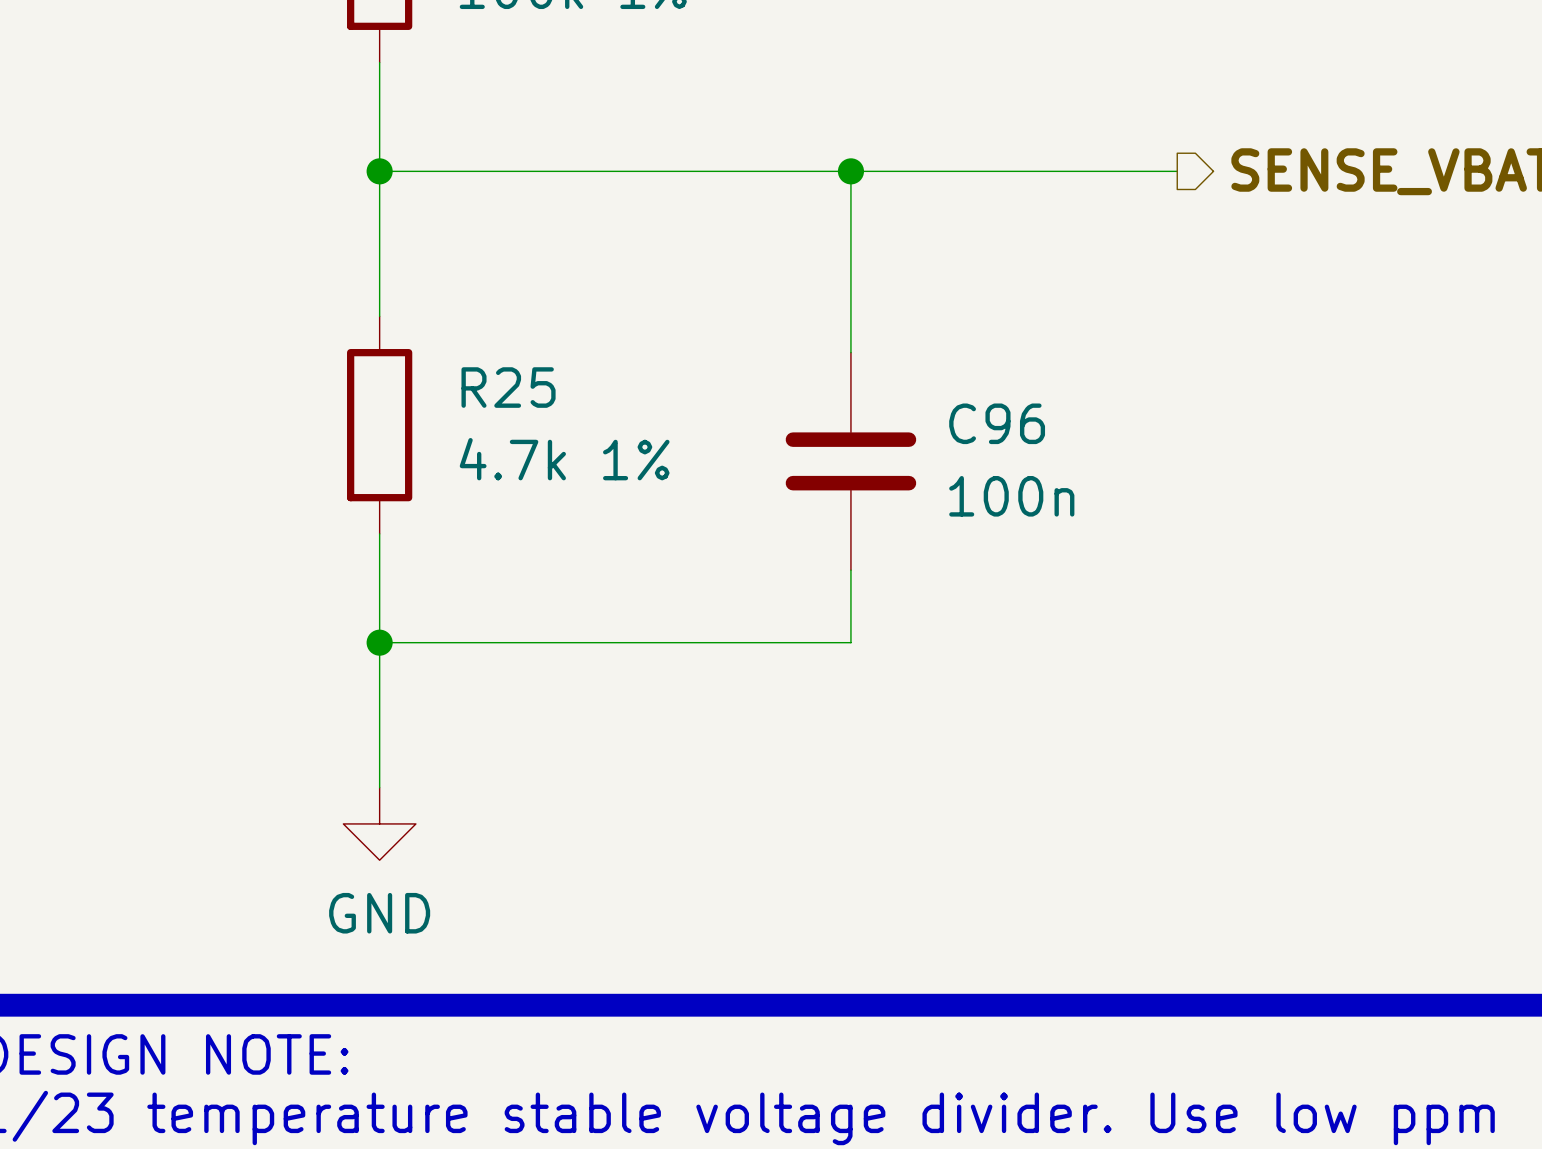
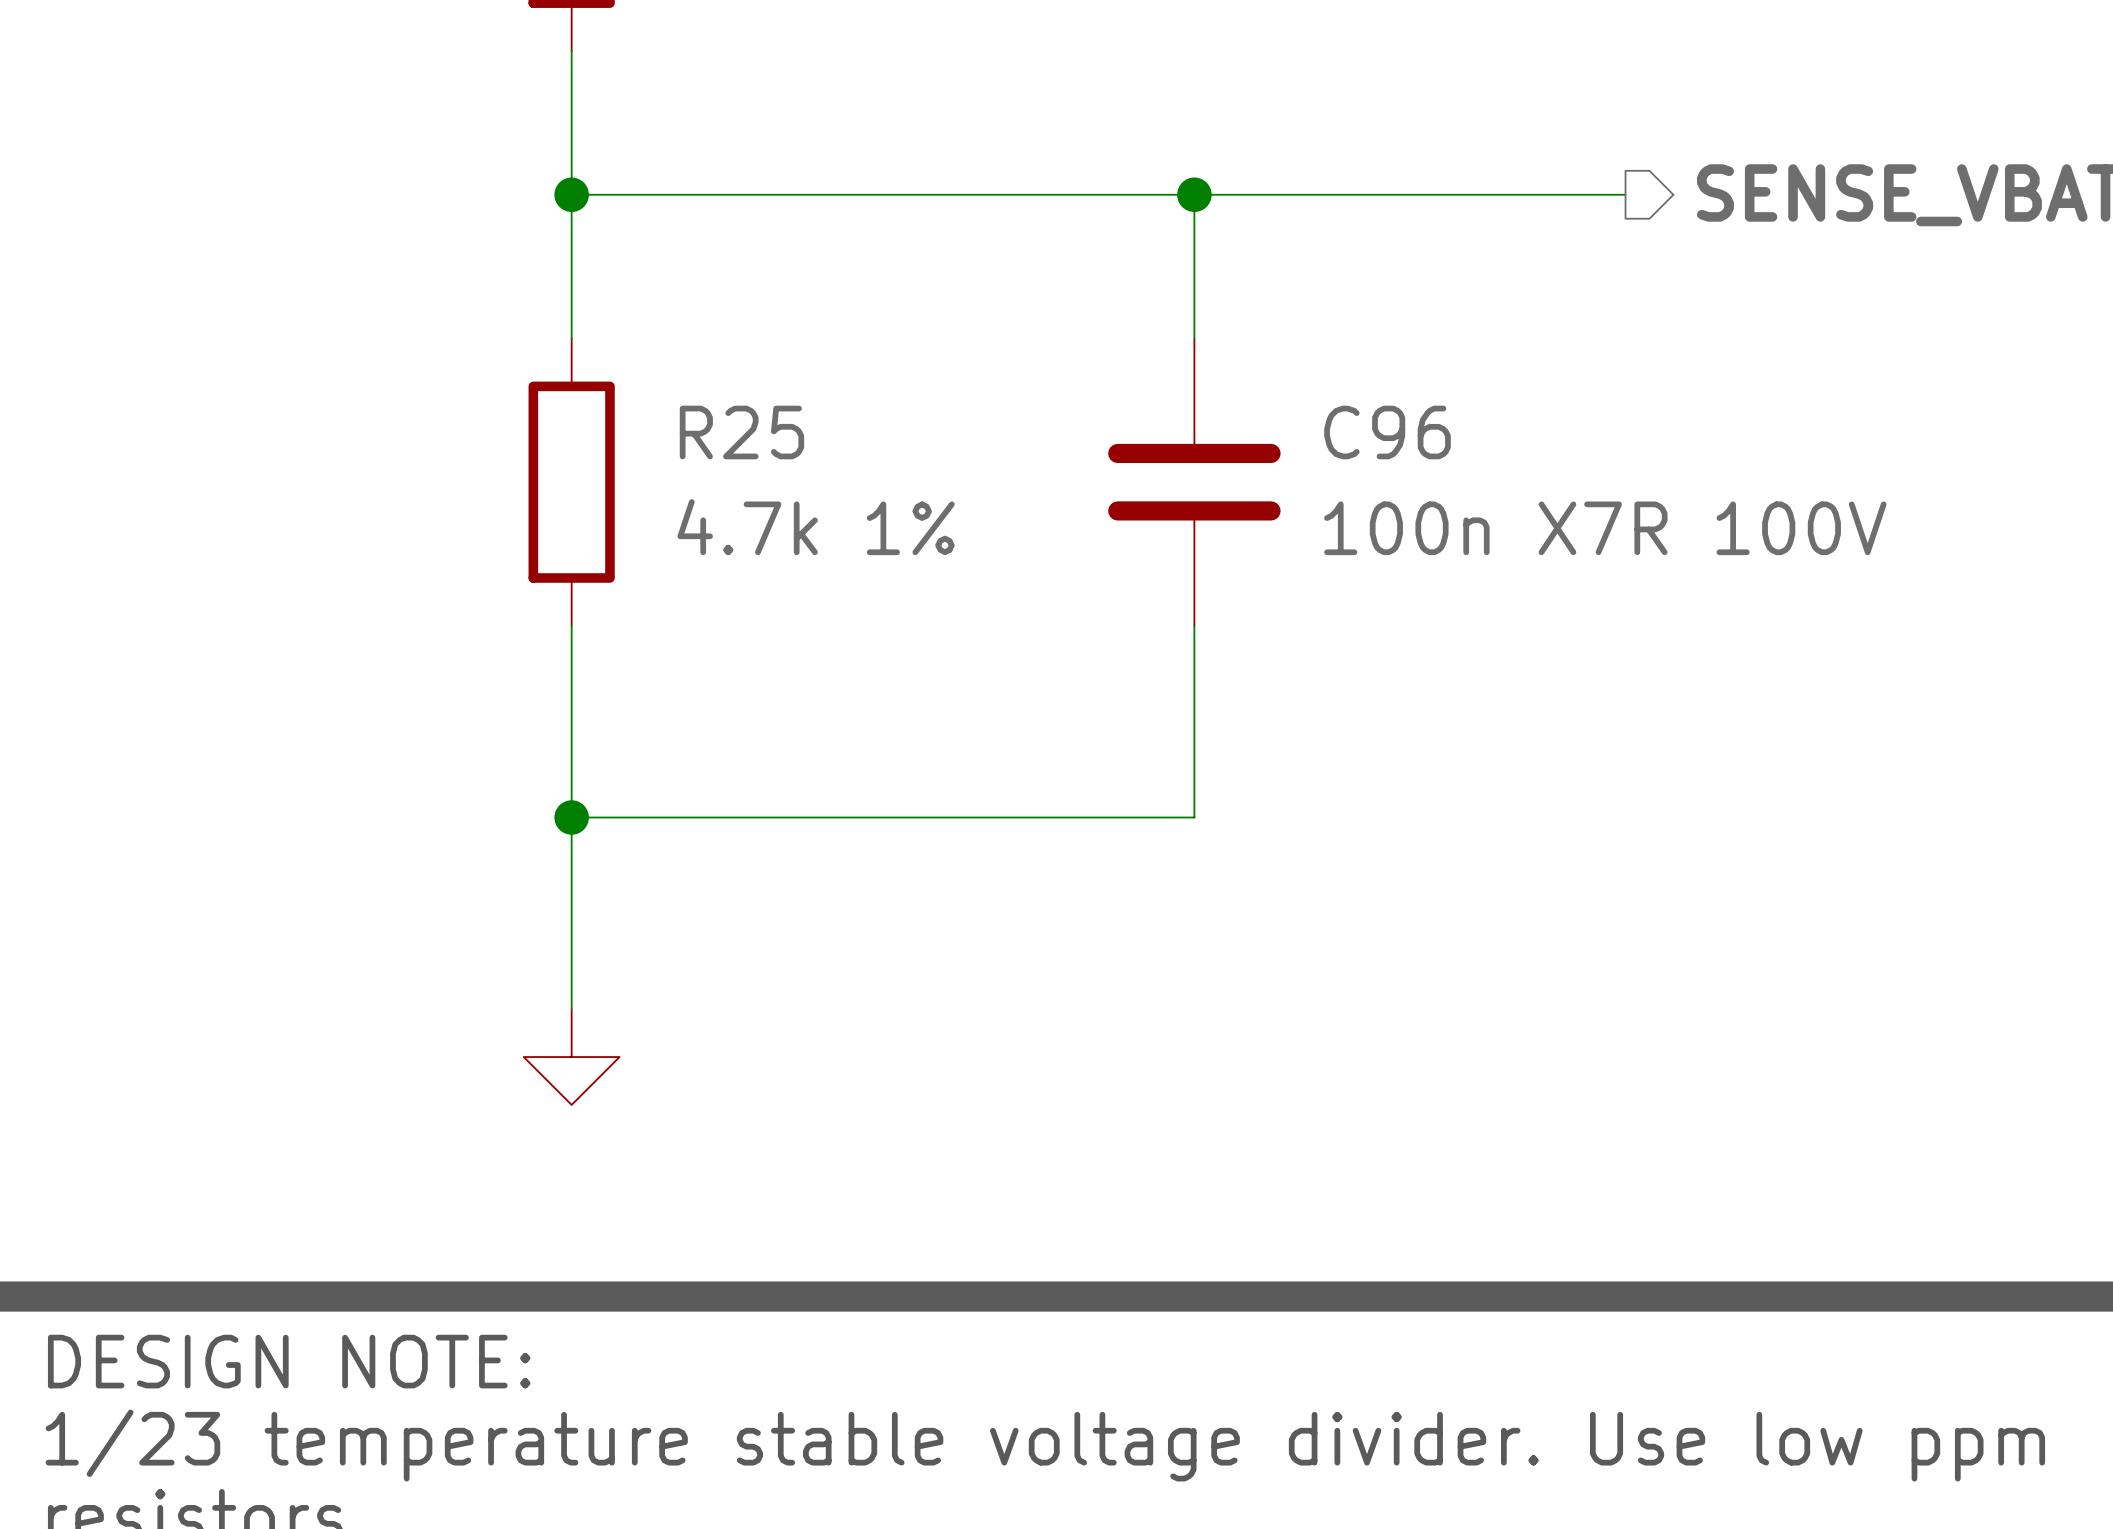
R25 position: (379, 425) -> (571, 482)
C96 position: (850, 461) -> (1194, 482)
C96 value: 100n (1011, 496) -> 100n X7R 100V (1605, 528)
power symbol text: GND (379, 913) -> none

